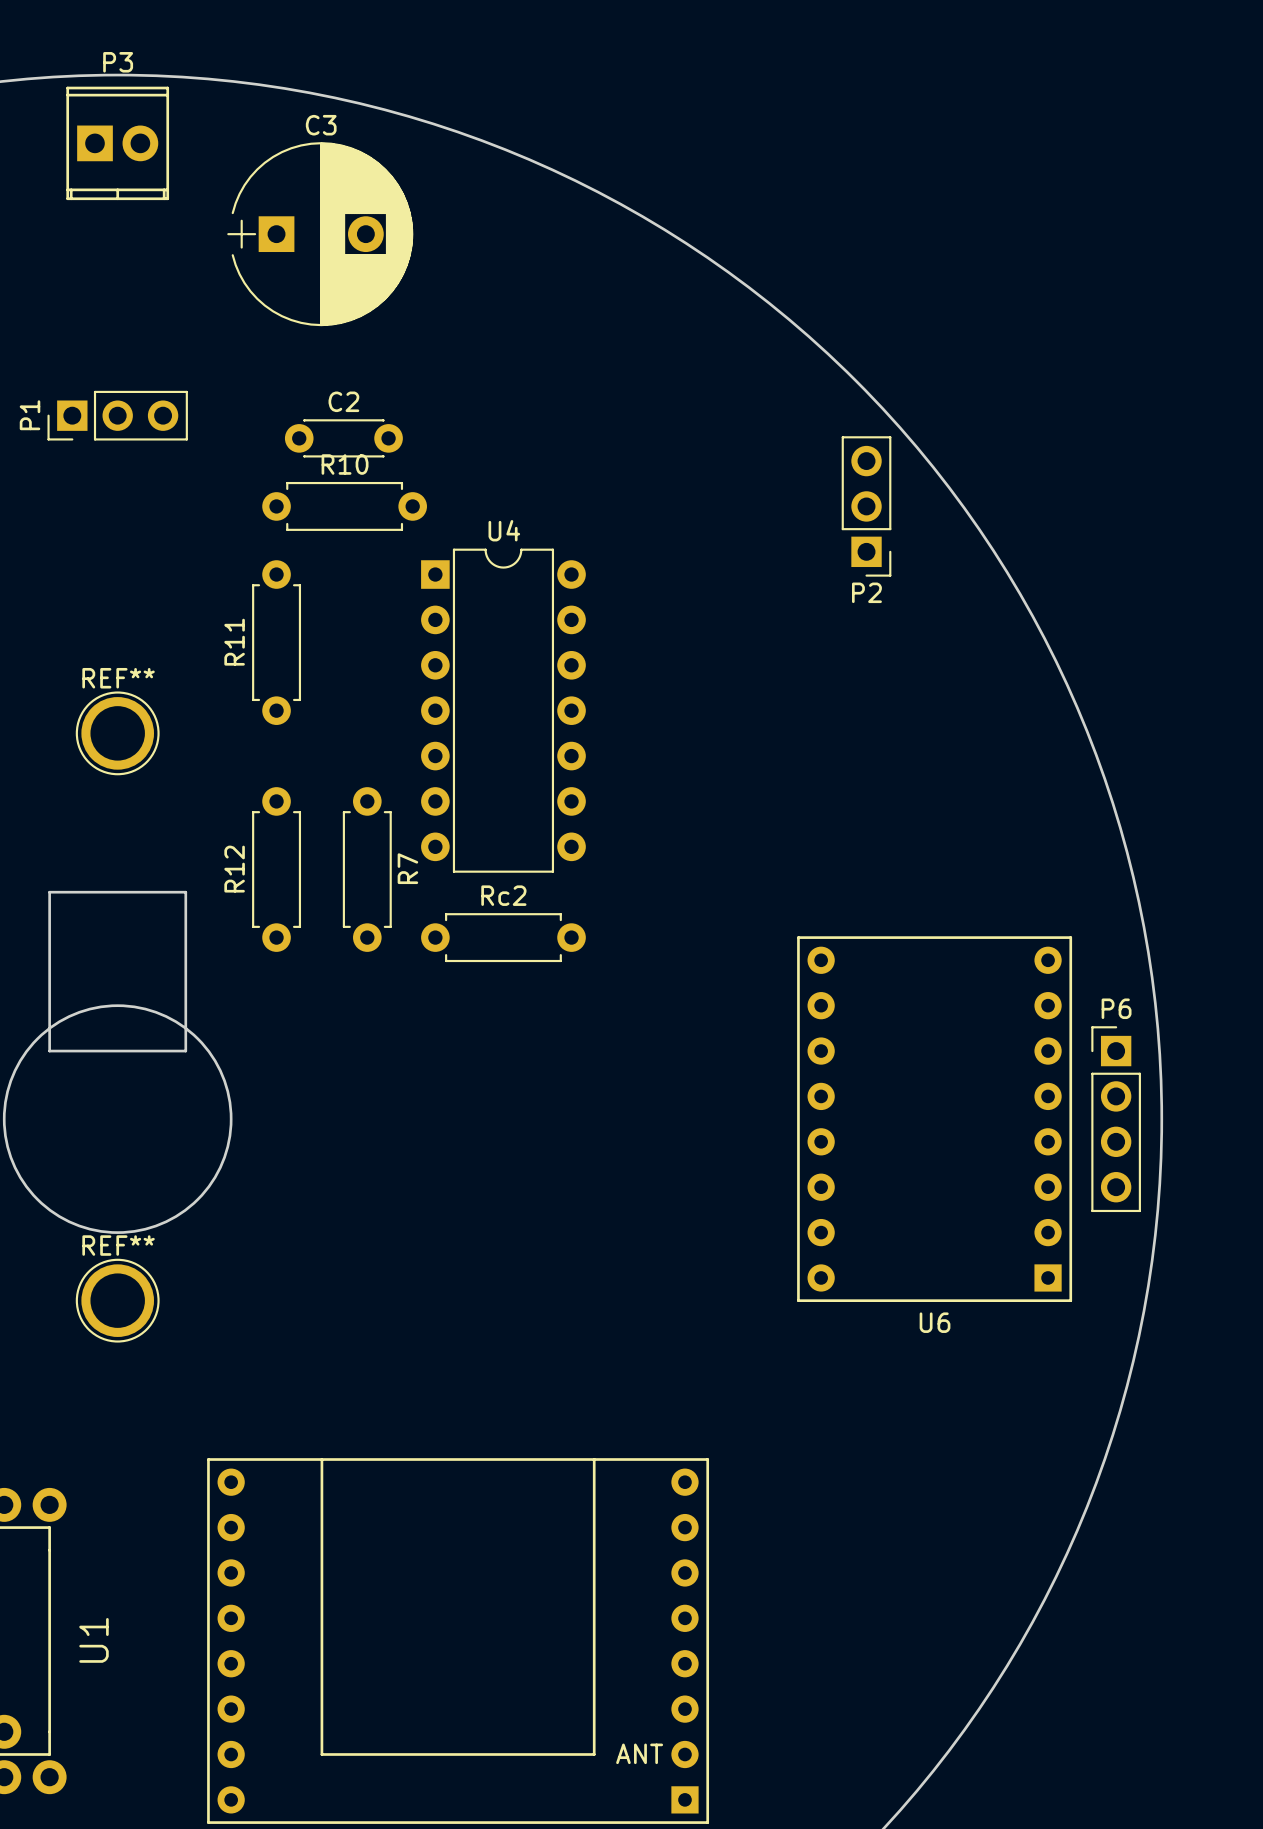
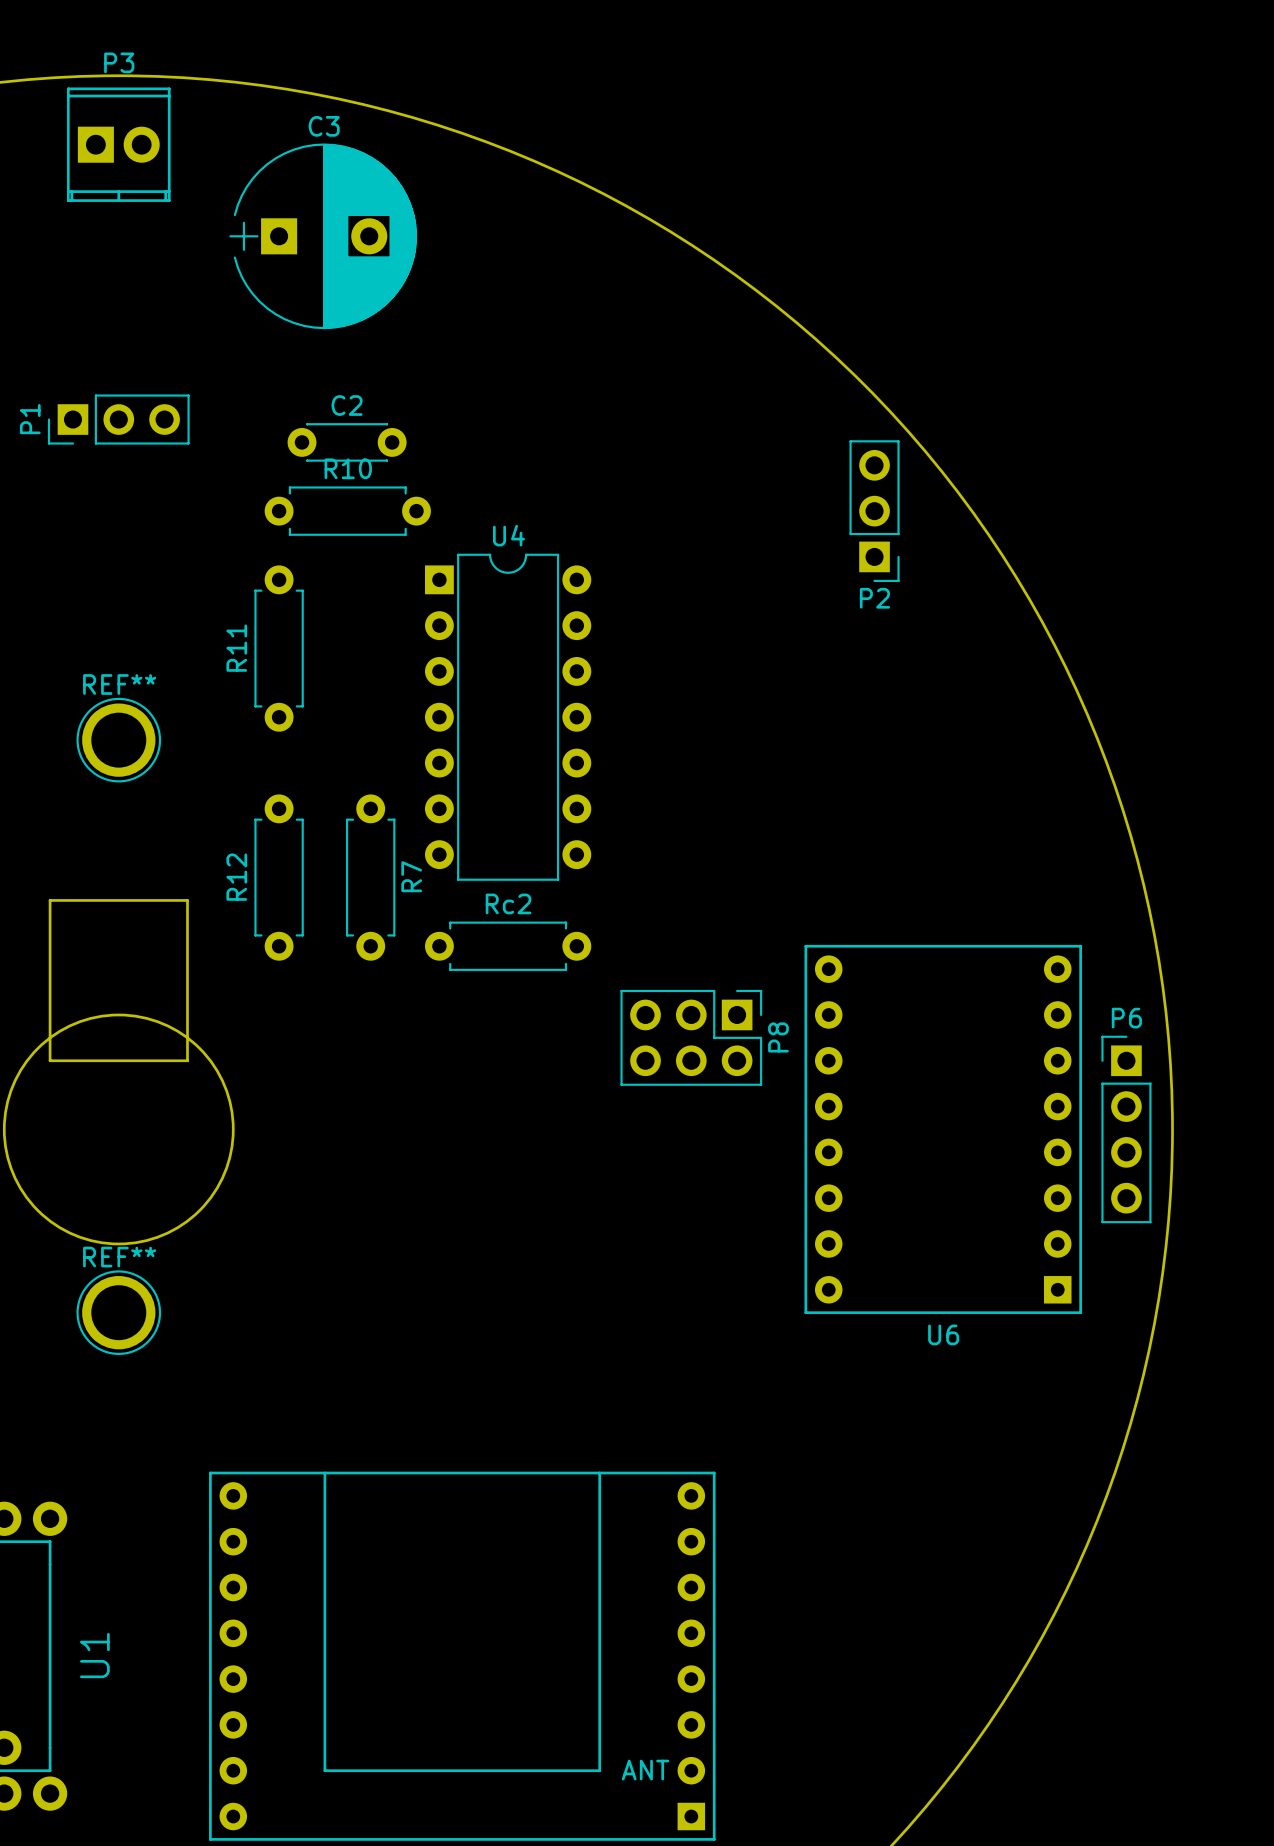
P8: none -> (691, 1037)

